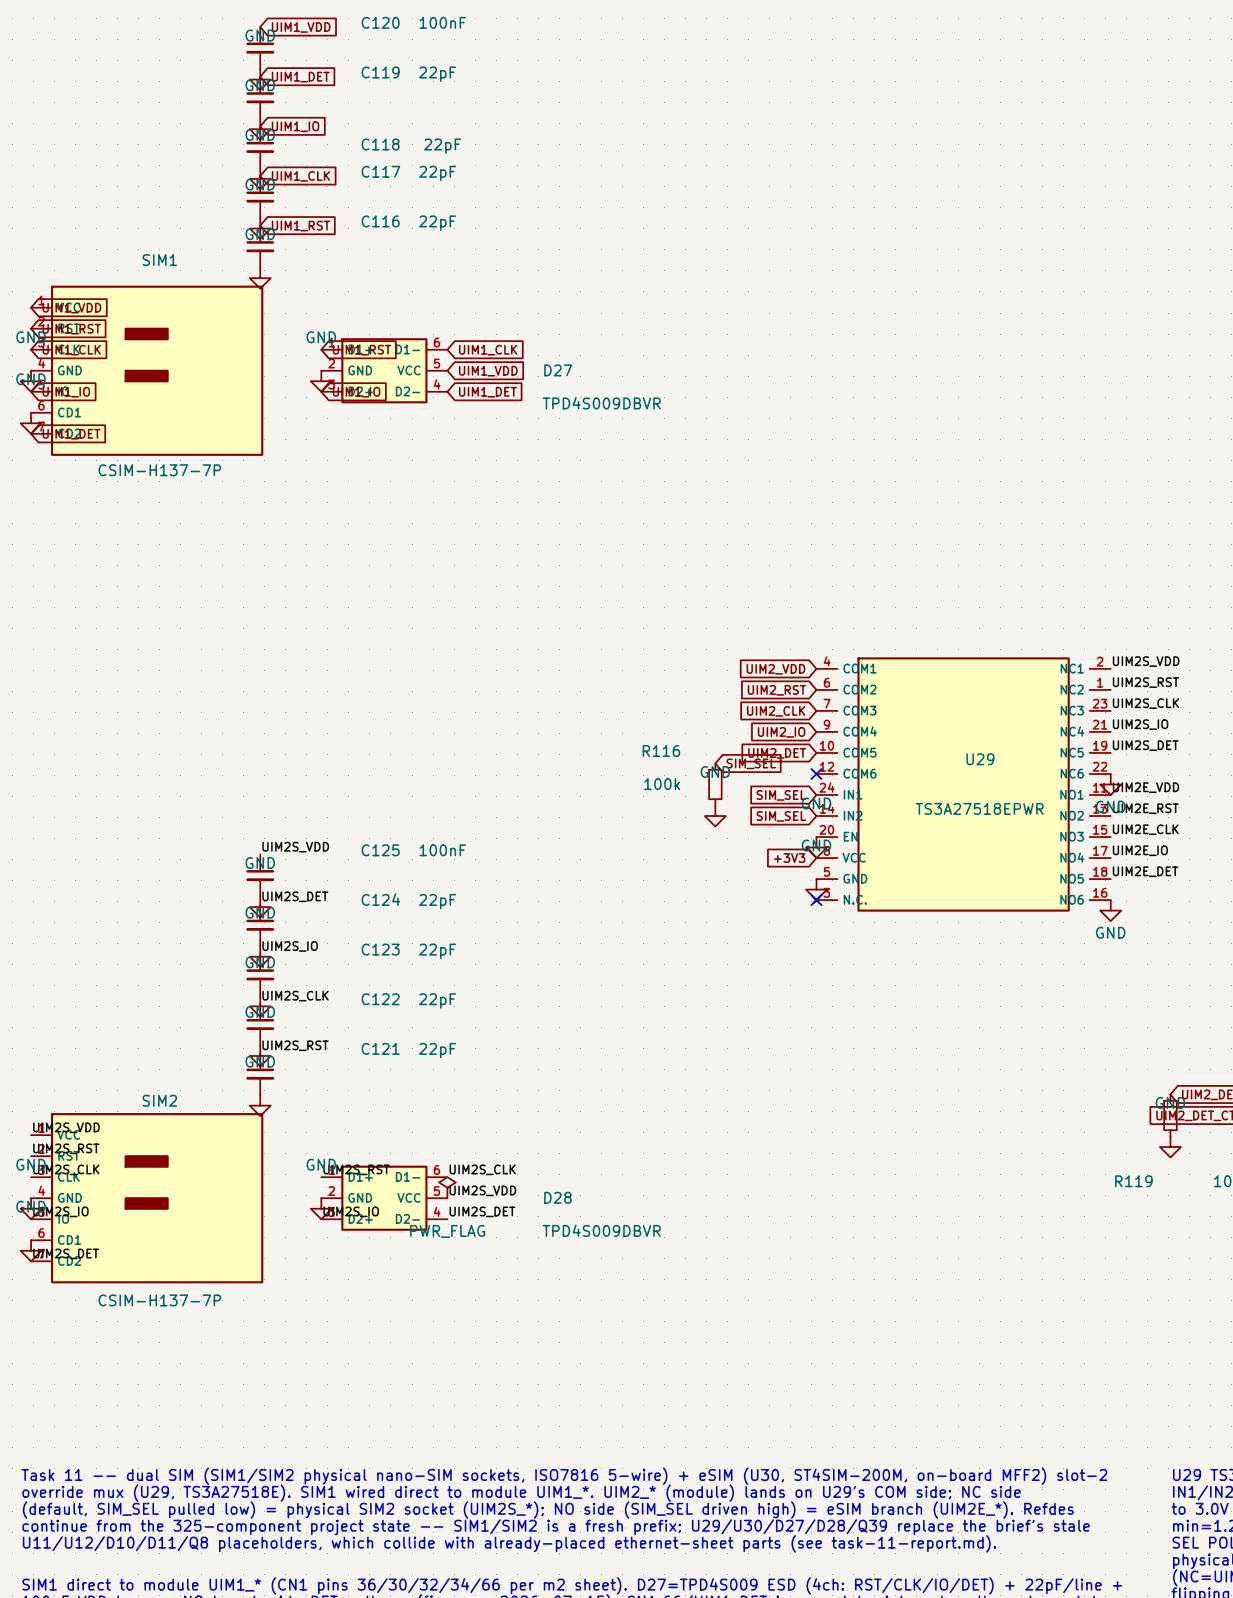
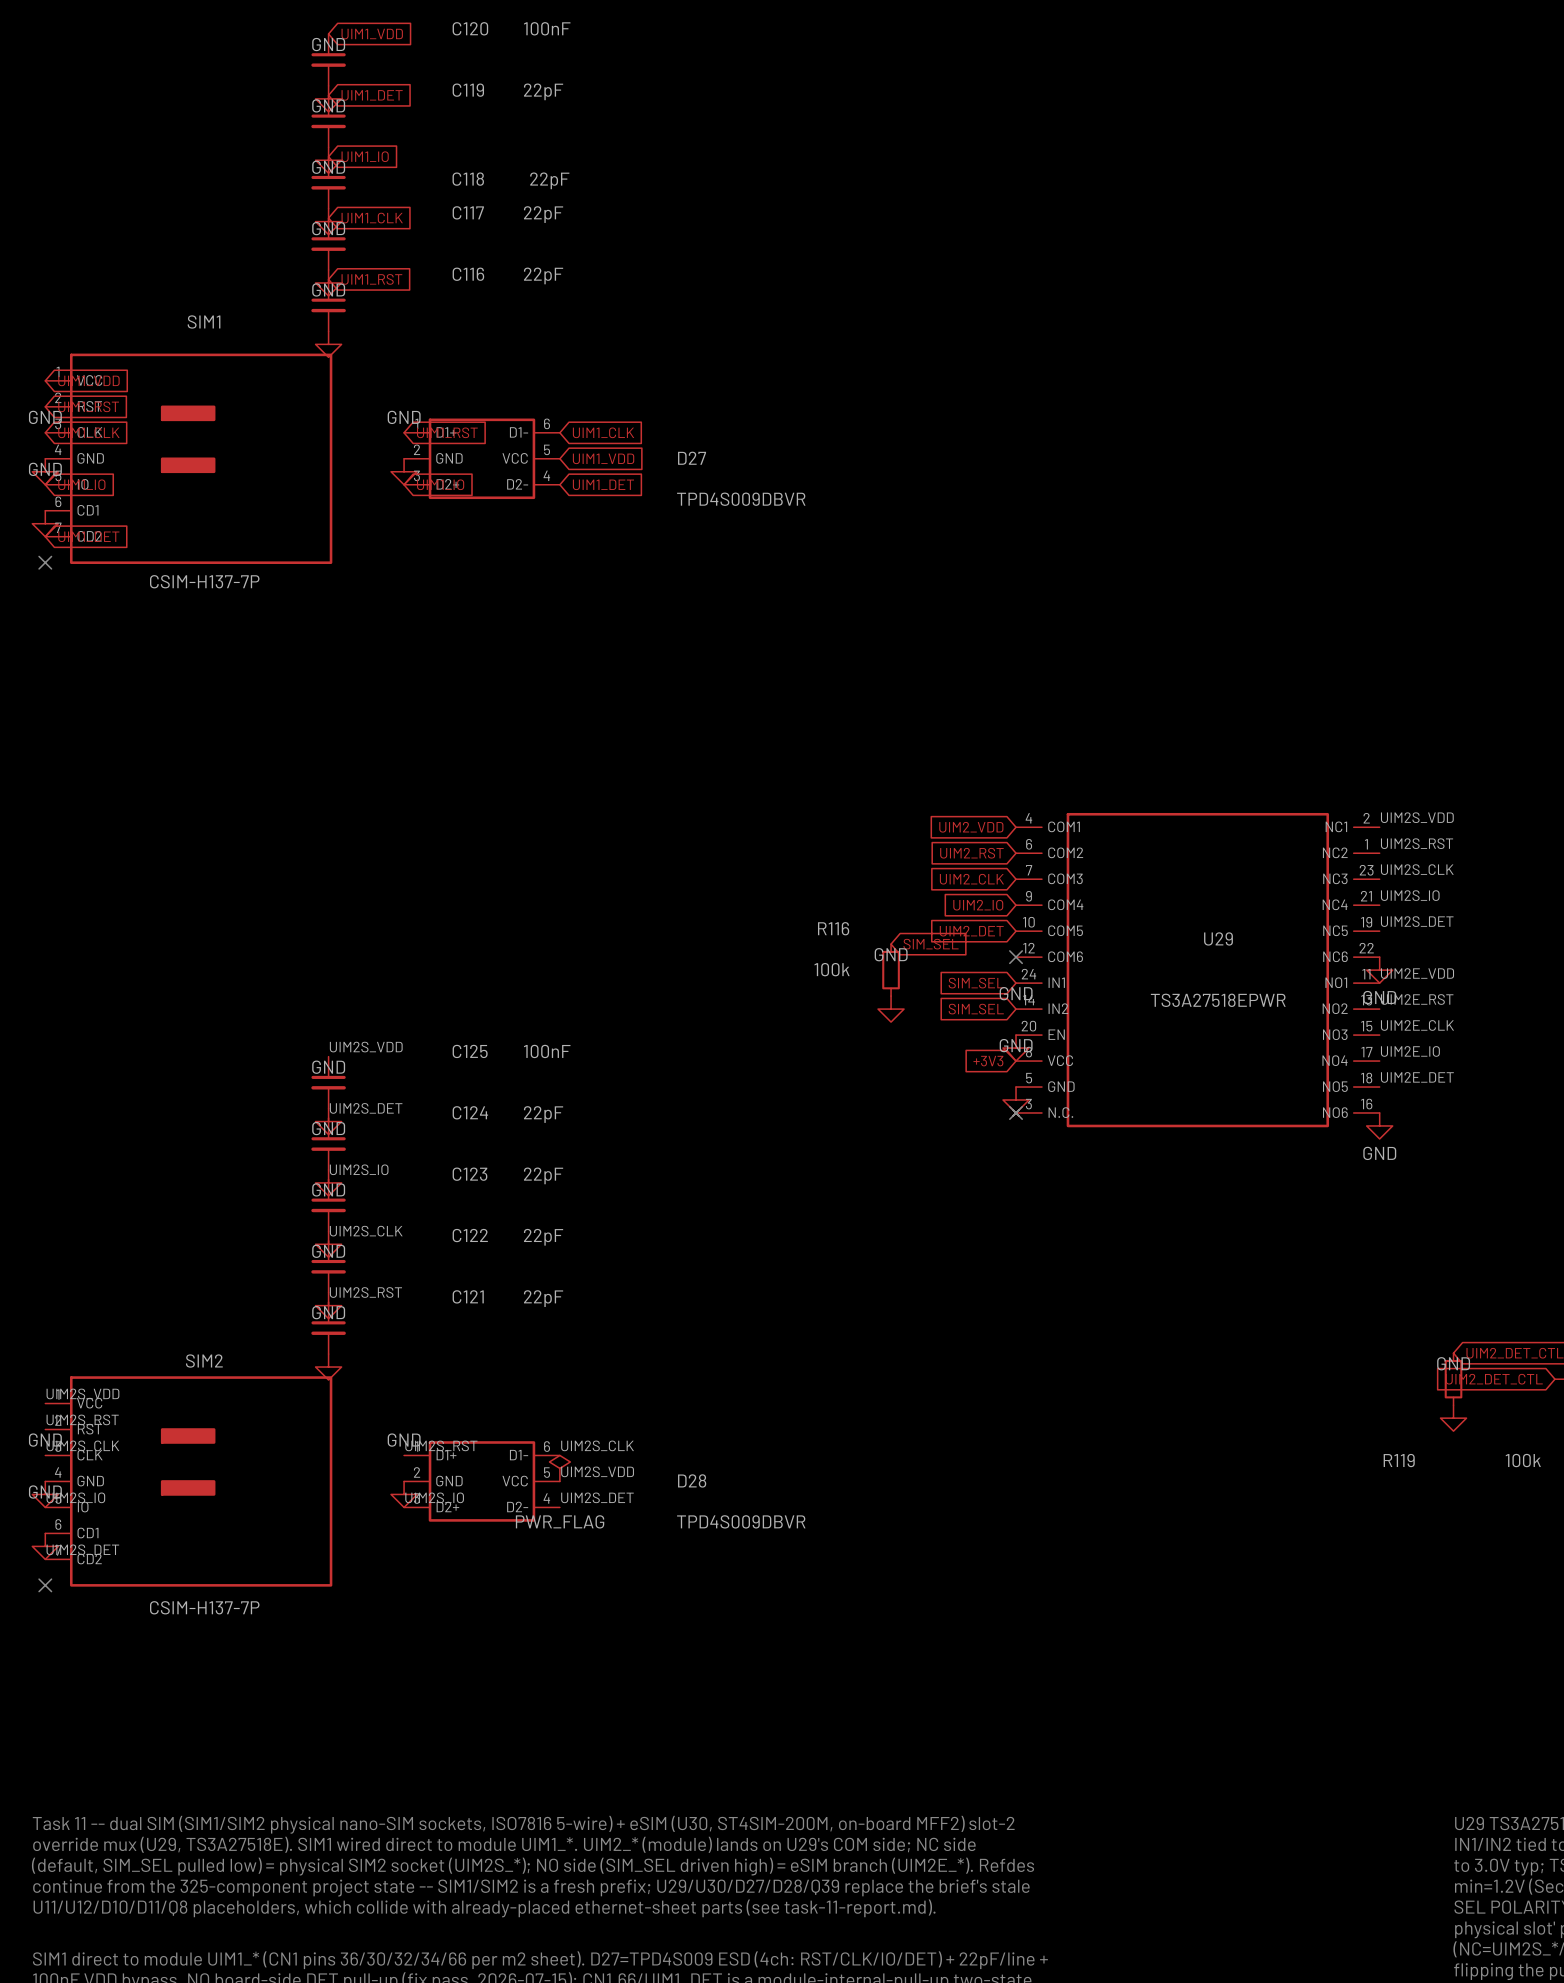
no-connect mark: none -> (45, 562)
no-connect mark: none -> (45, 1585)

